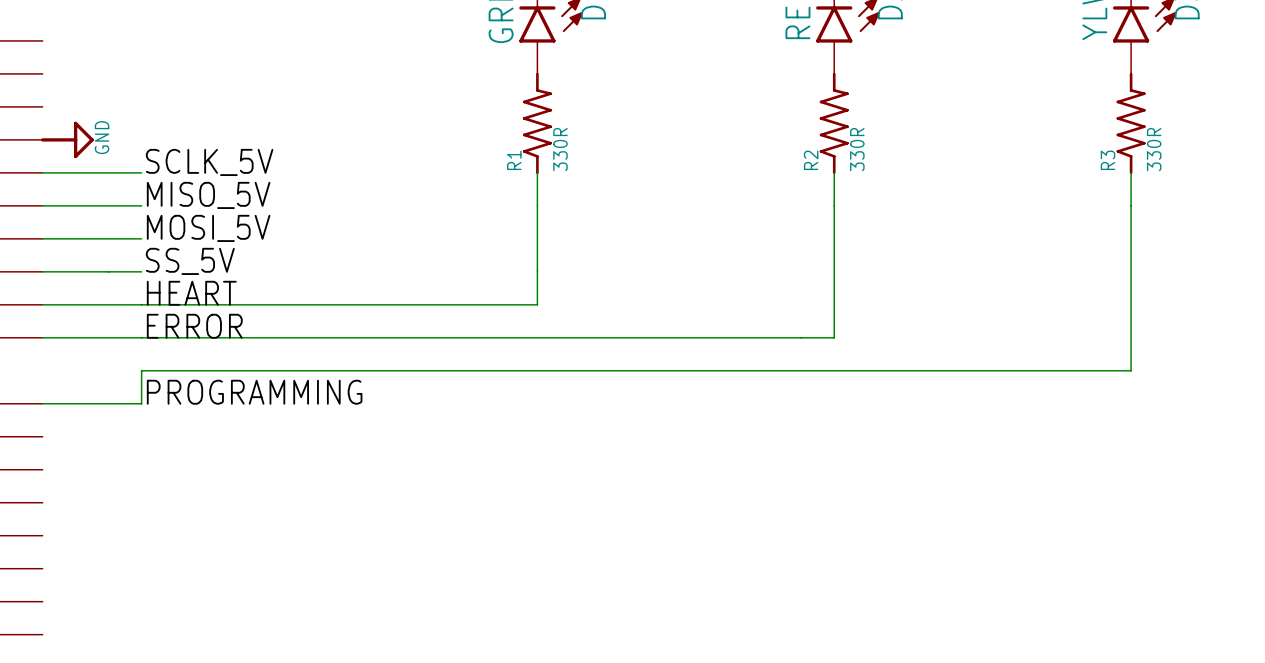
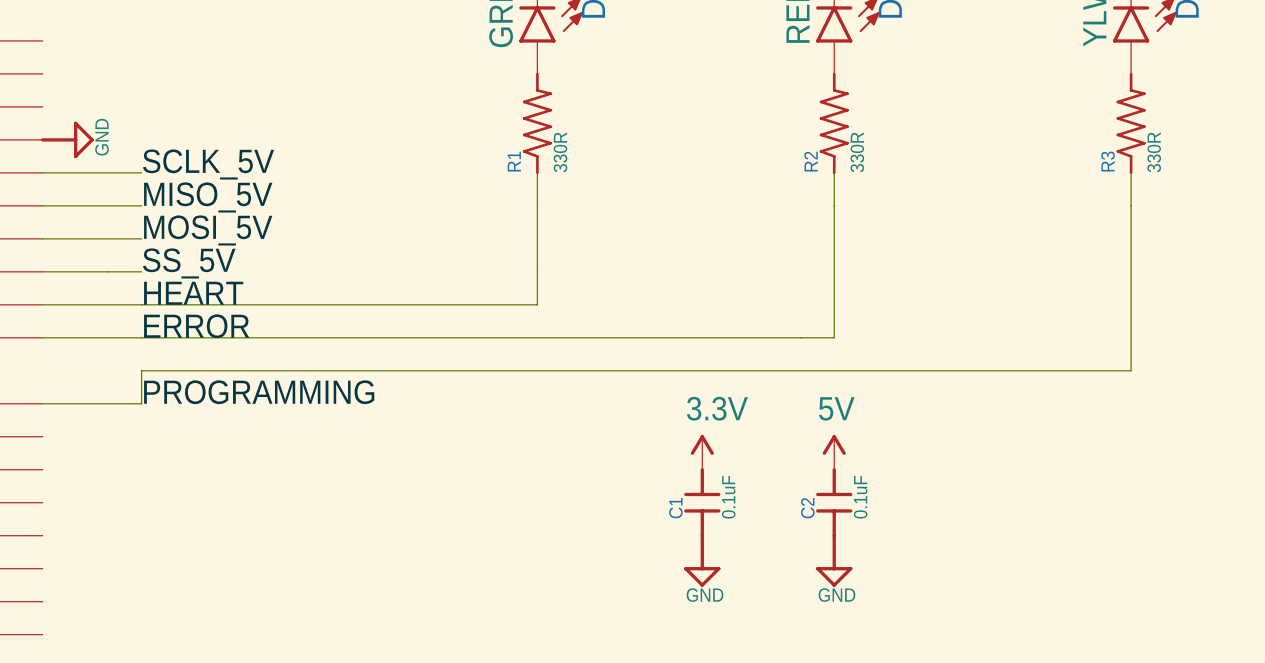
power symbol: none -> 3.3V (702, 452)
power symbol: none -> 5V (834, 452)
C1: none -> 0.1uF (702, 502)
C2: none -> 0.1uF (834, 502)
power symbol: none -> GND (702, 560)
power symbol: none -> GND (834, 560)

